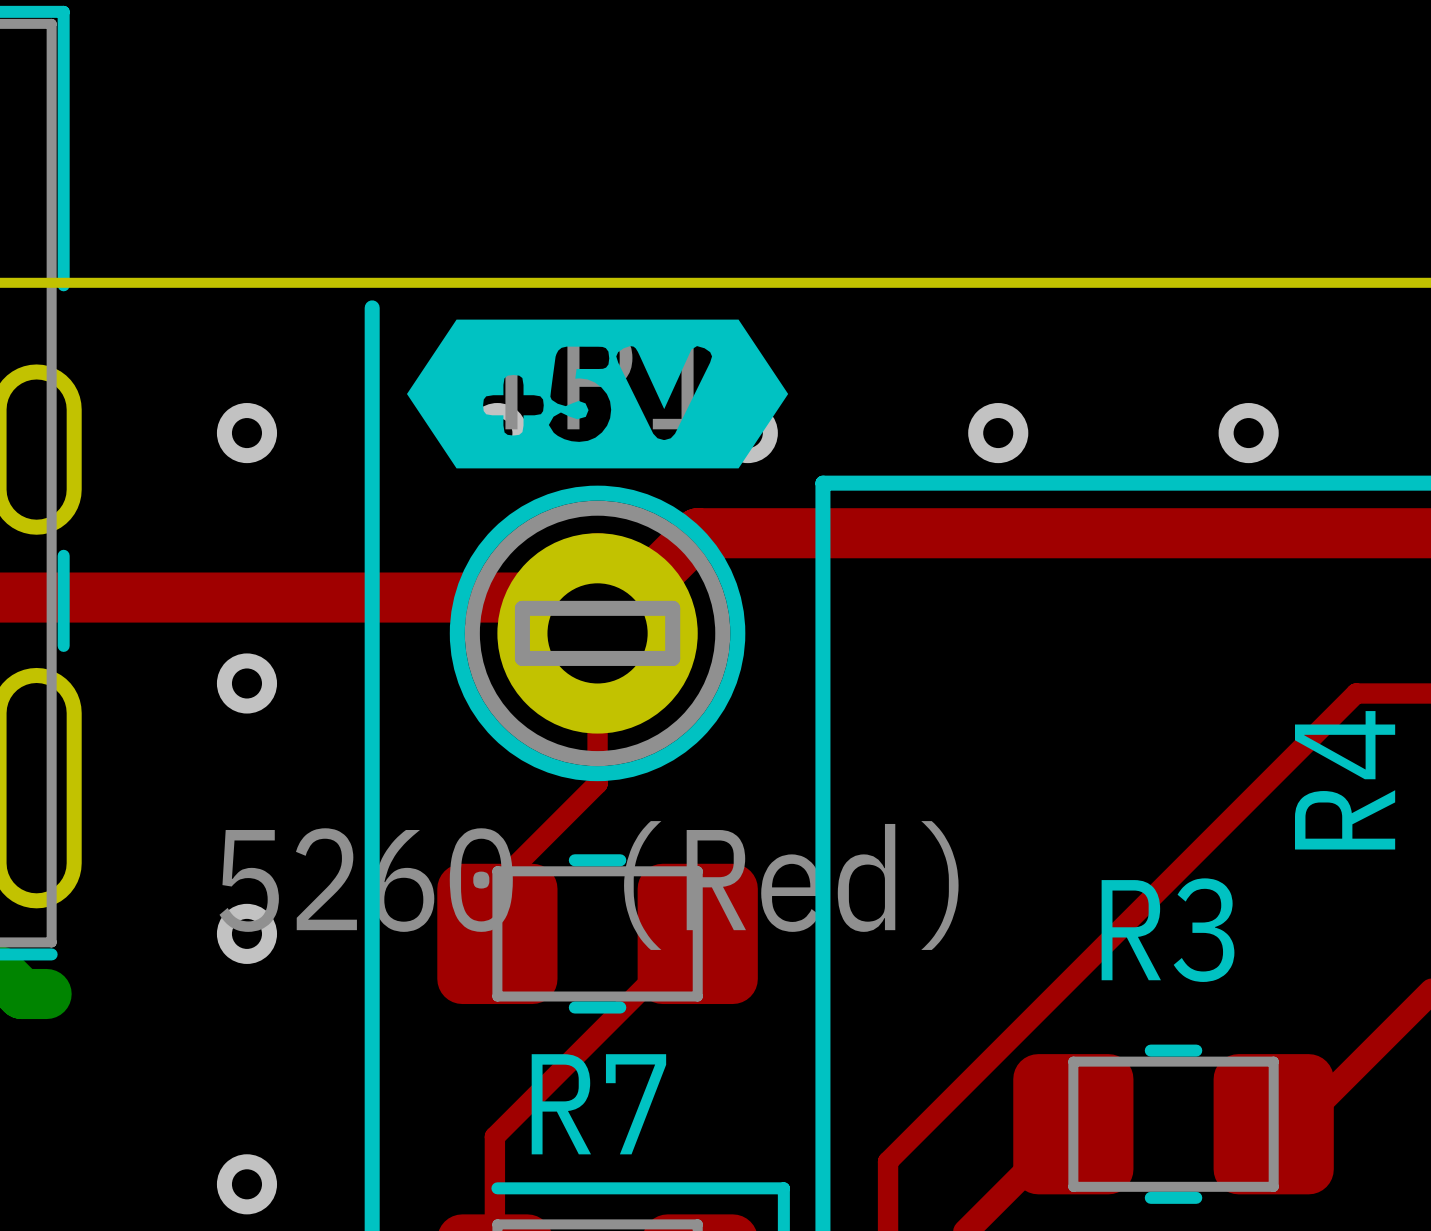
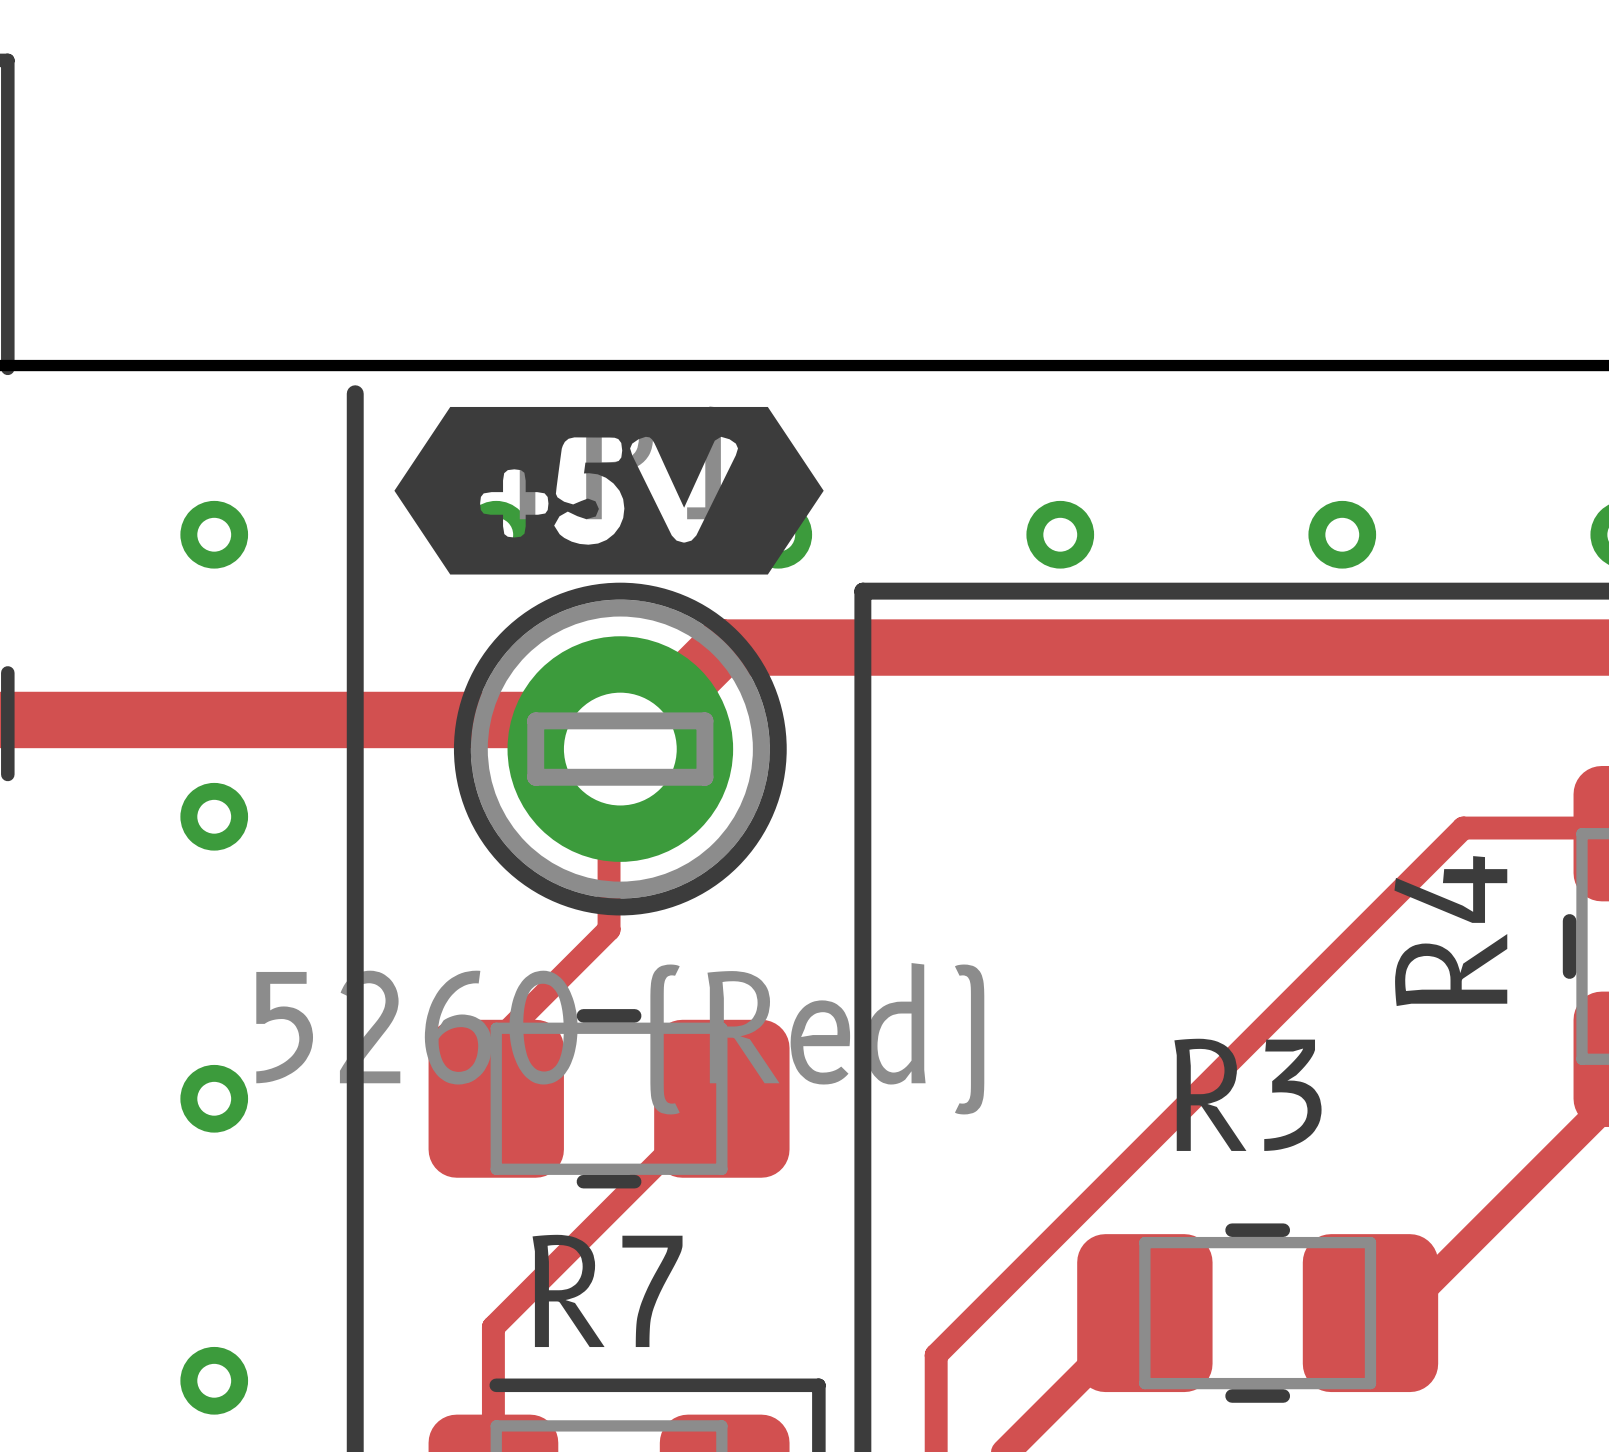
part position: (597, 633) -> (620, 749)

